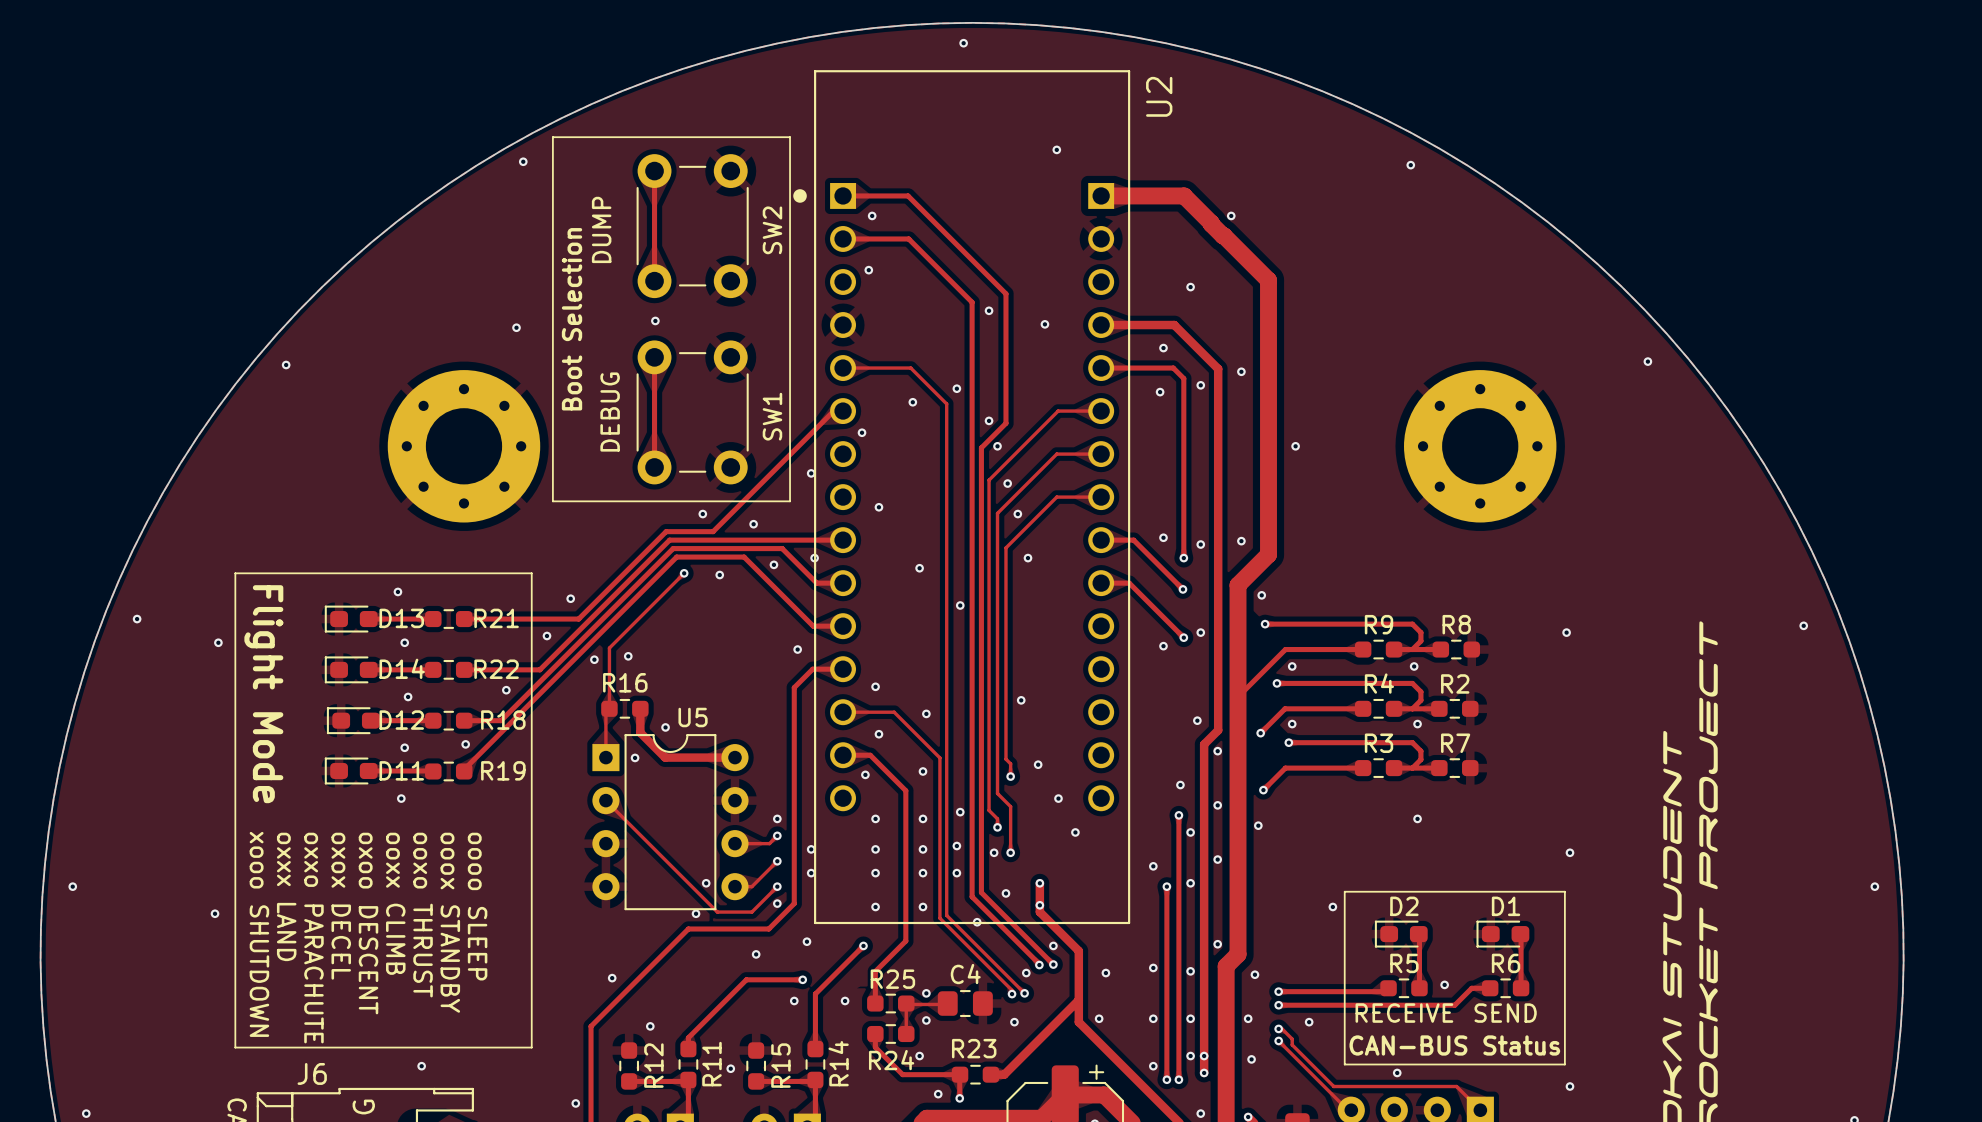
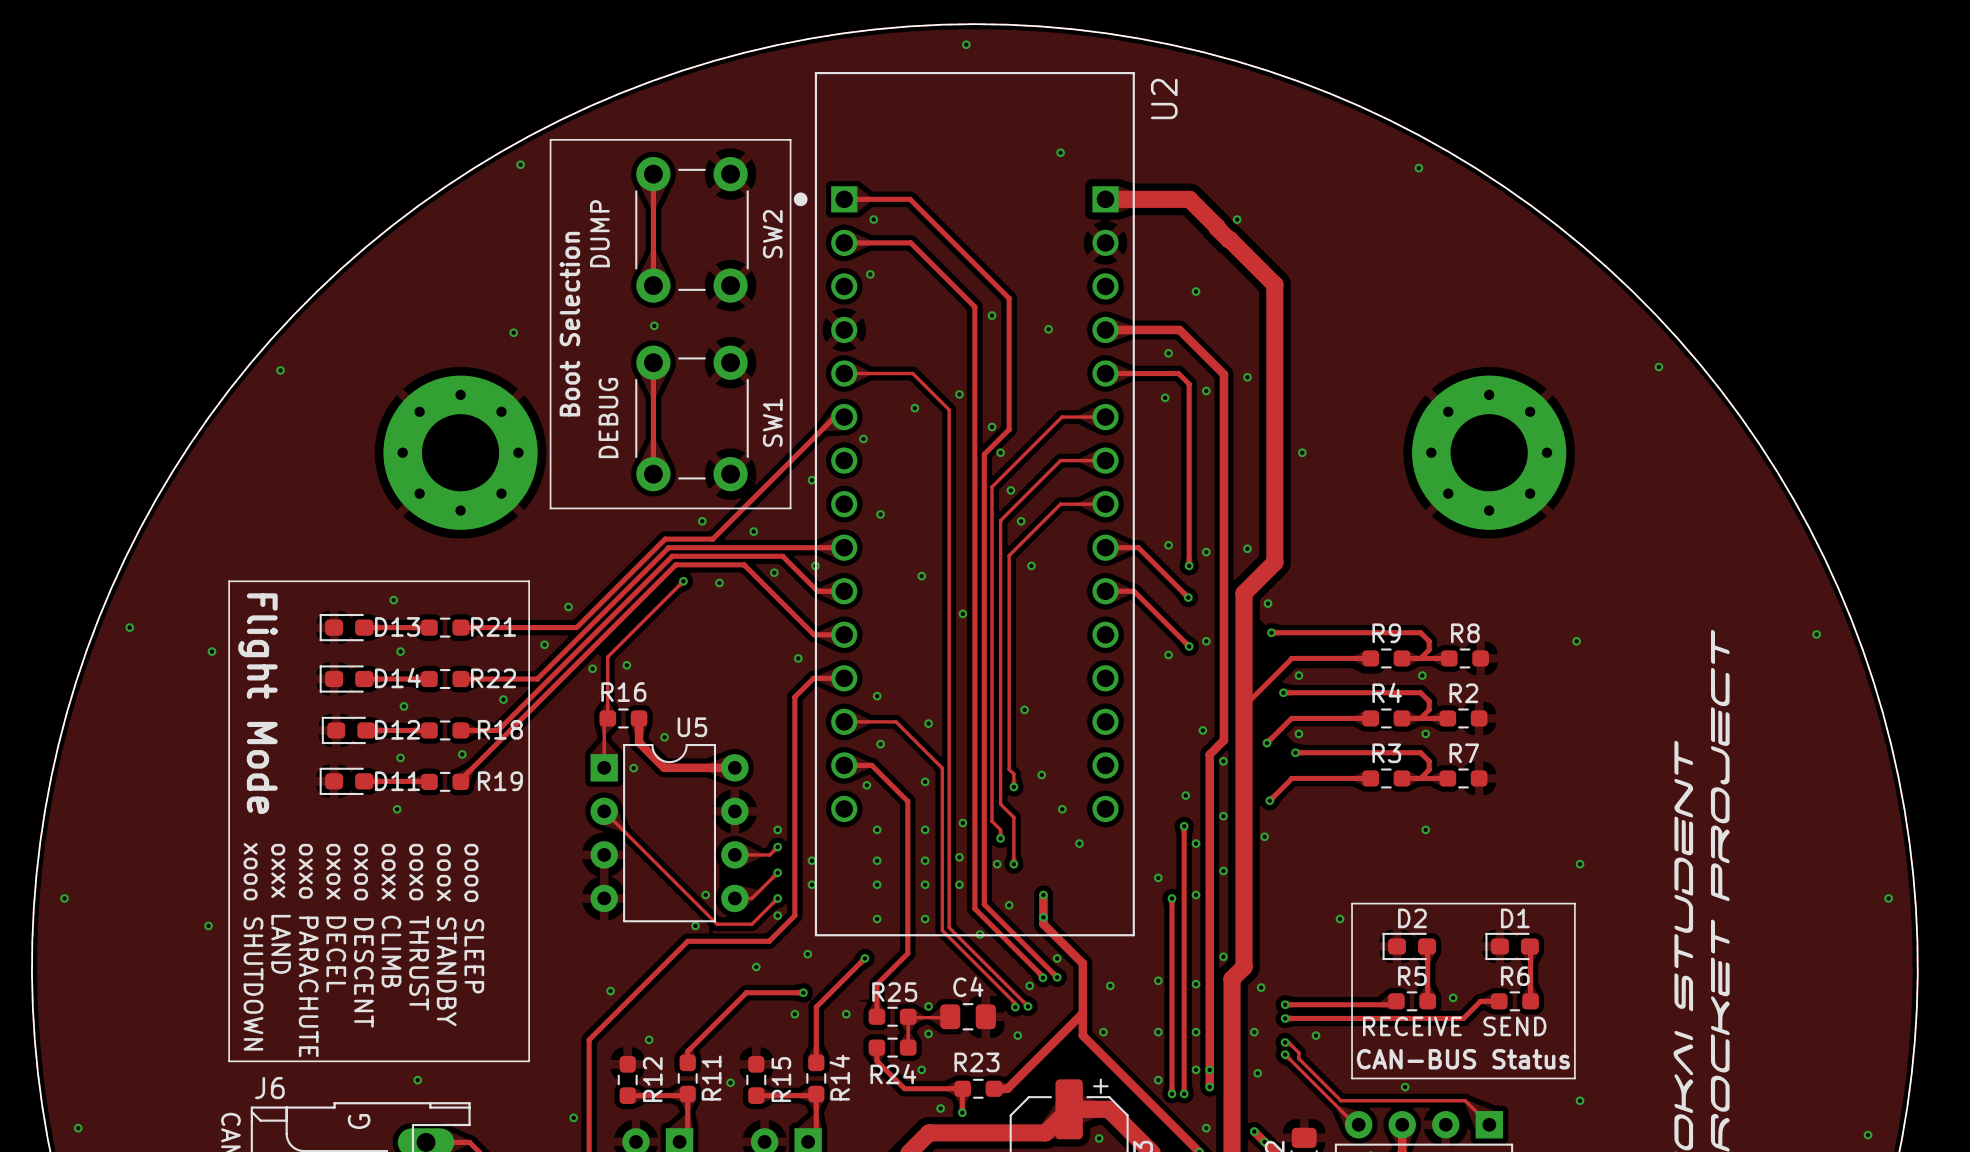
J6 name position: J6 (312, 1073) -> J6 (269, 1088)

